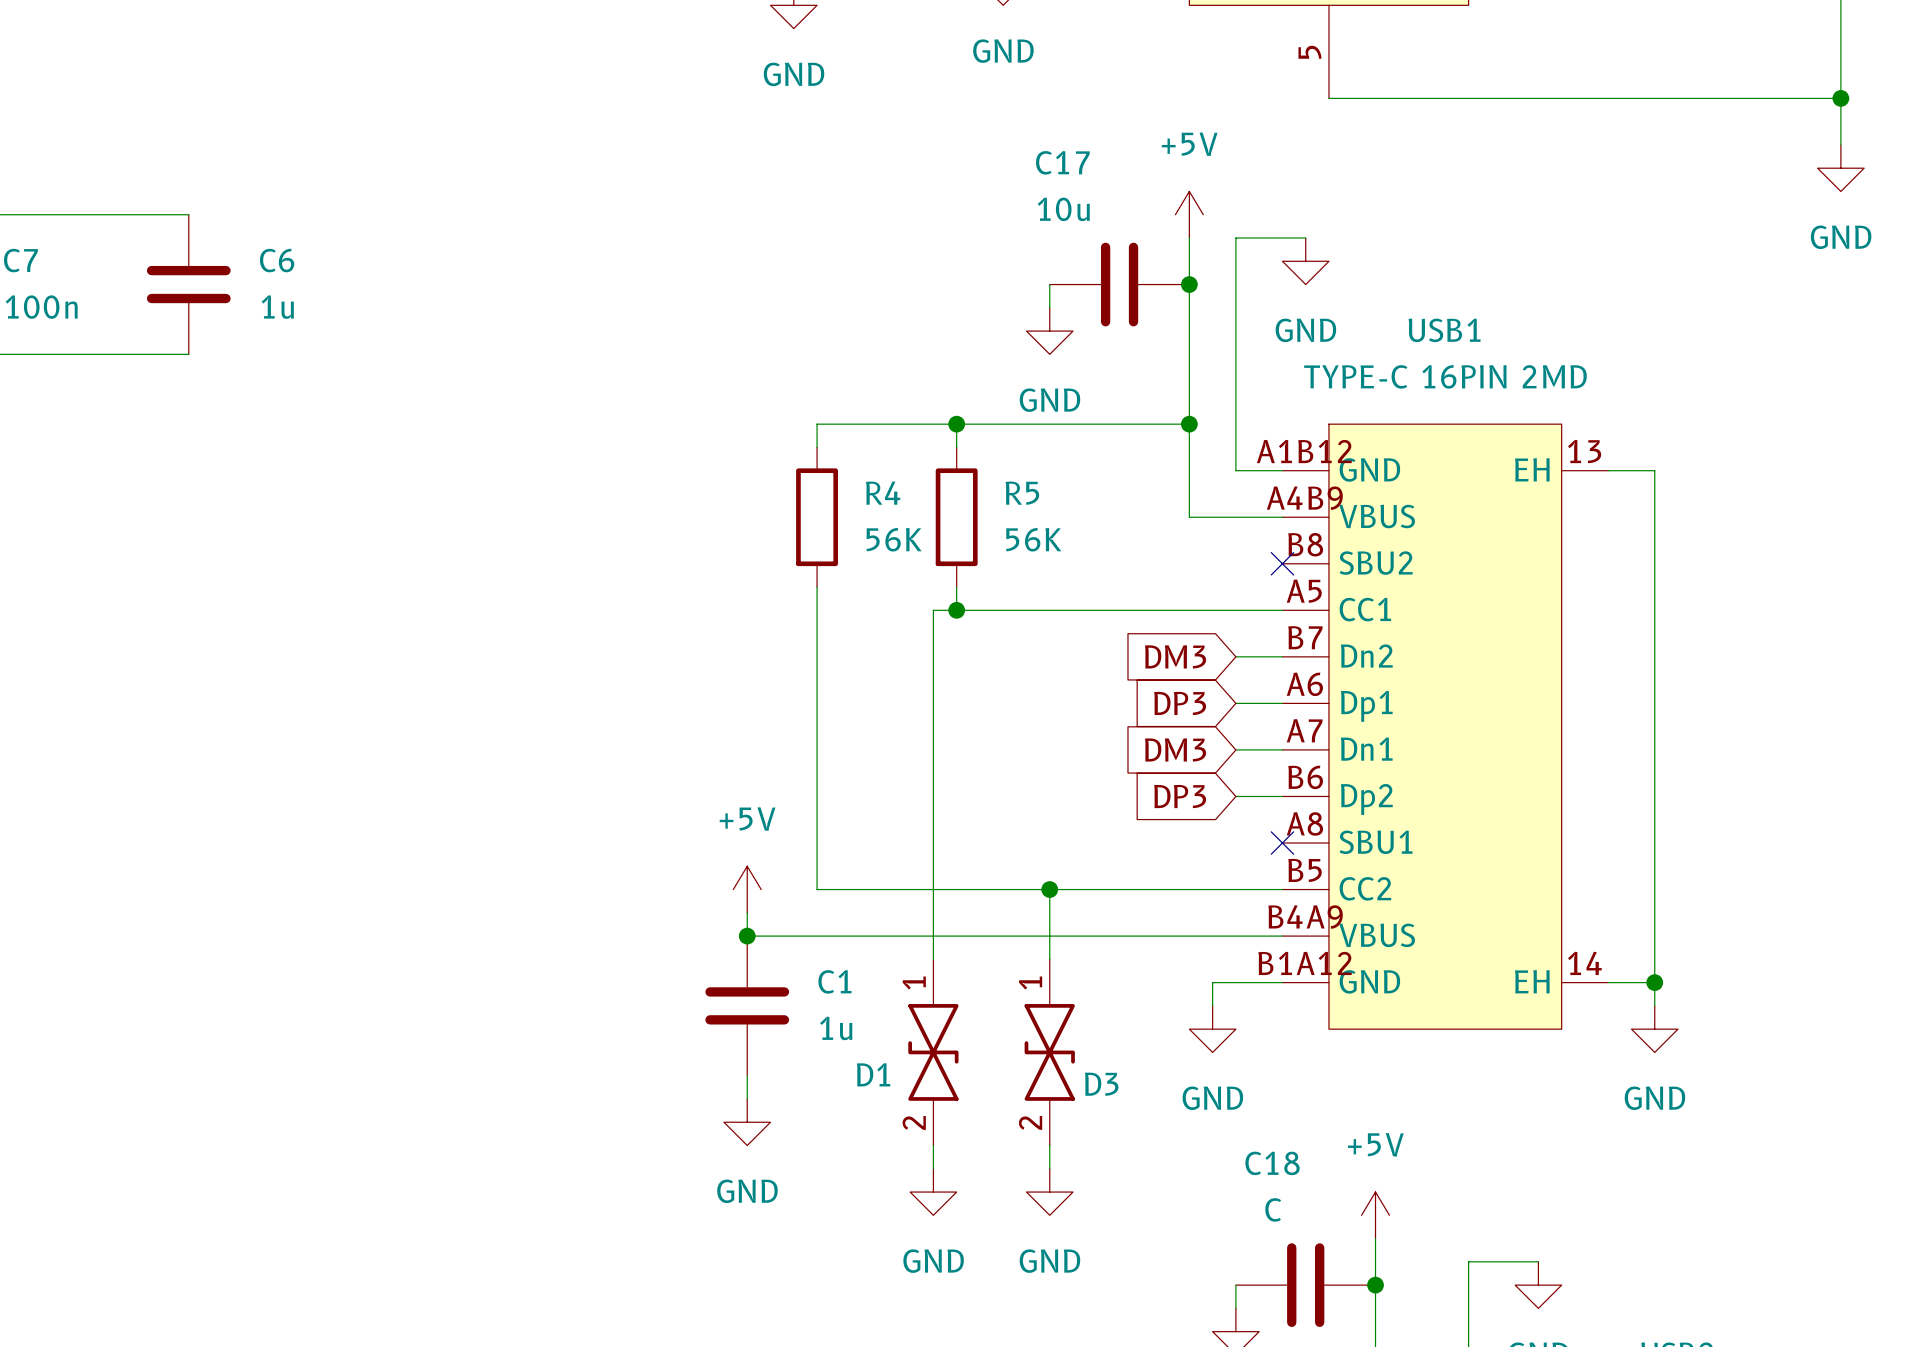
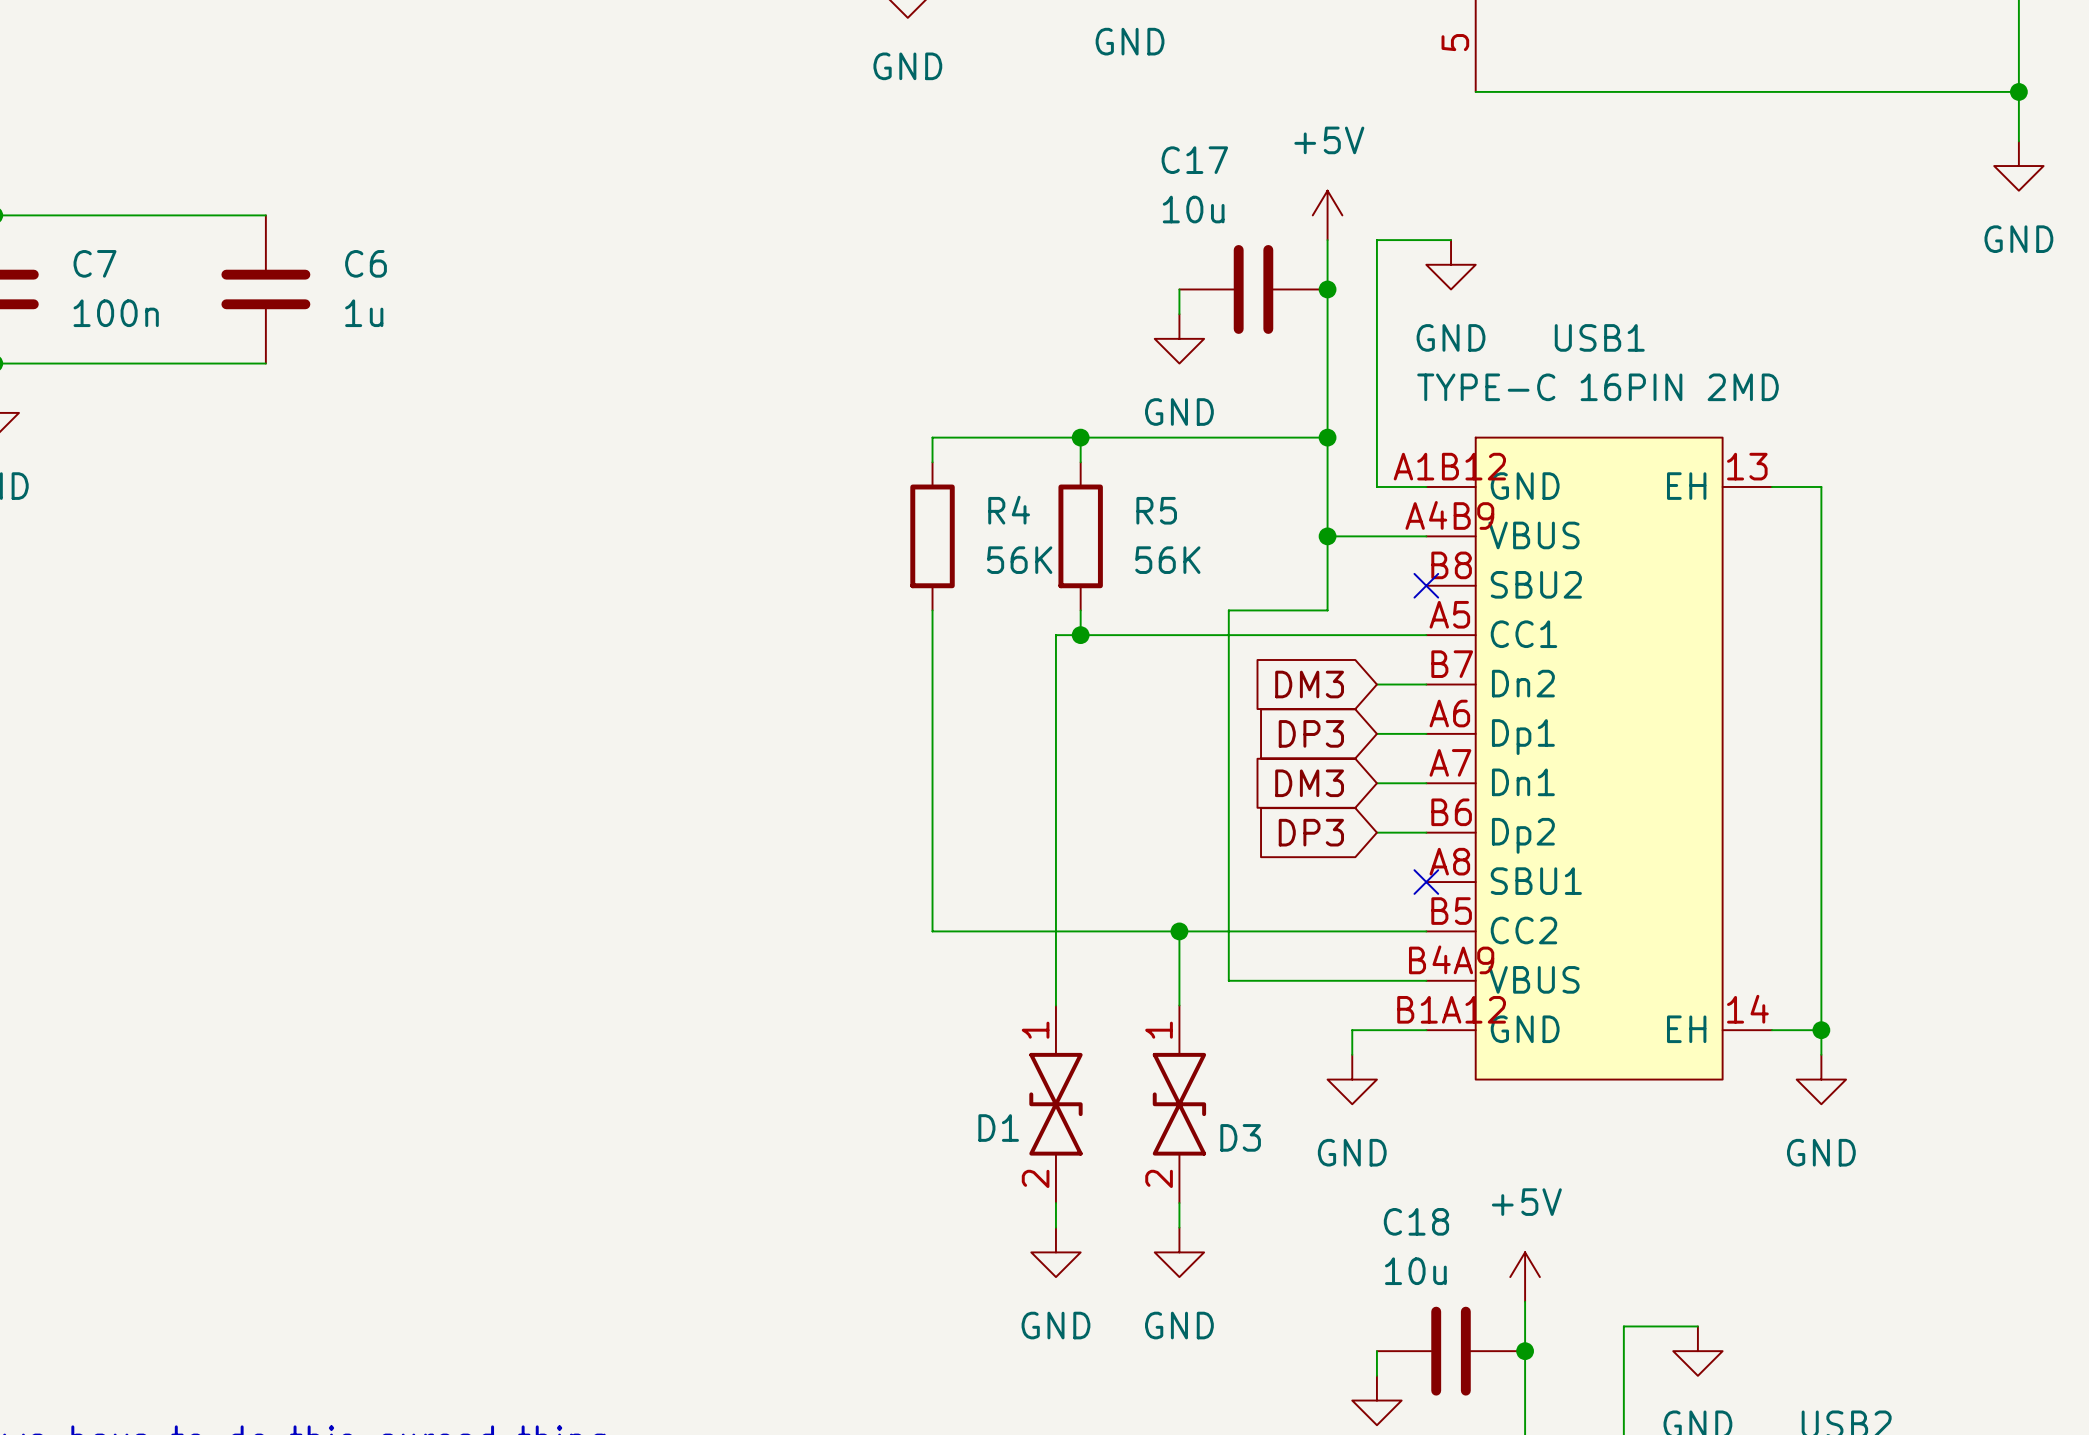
junction: none -> (1327, 536)
power symbol: +5V (747, 889) -> none
wire: (747, 912) (747, 936) (1096, 936) -> (1327, 536) (1327, 610) (1228, 610) (1228, 980)
junction: (747, 936) -> none
C1: 1u (747, 1005) -> none
wire: (747, 1075) (747, 1098) -> none
power symbol: GND (747, 1122) -> none
C18 value: C (1273, 1209) -> 10u (1415, 1271)

